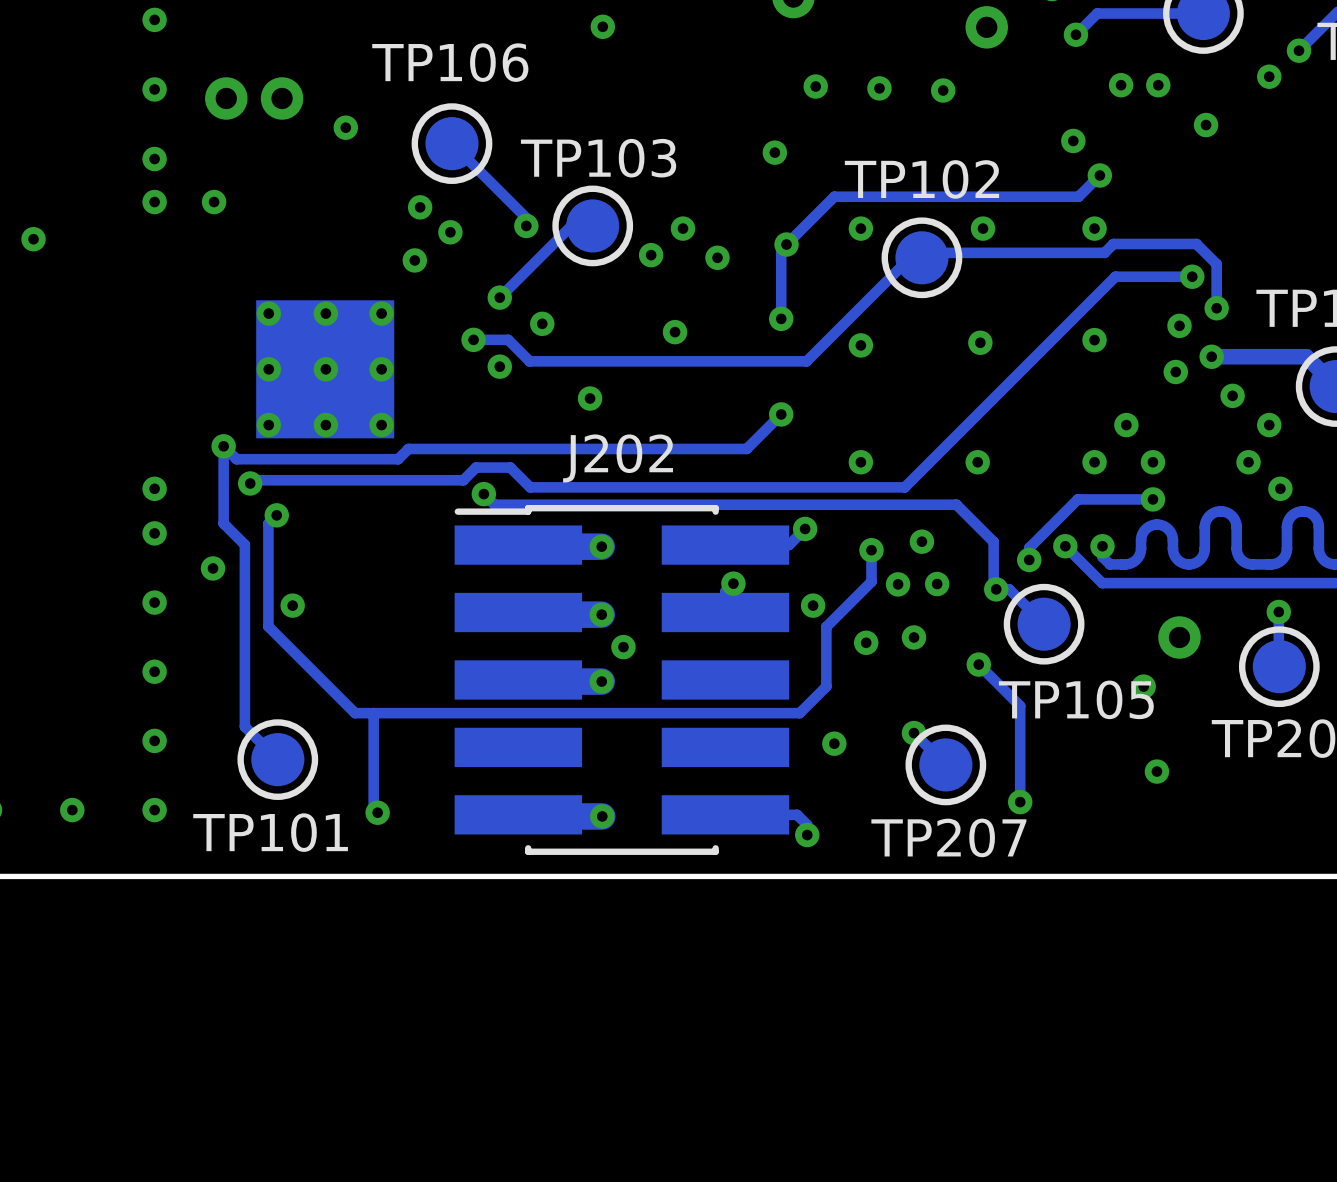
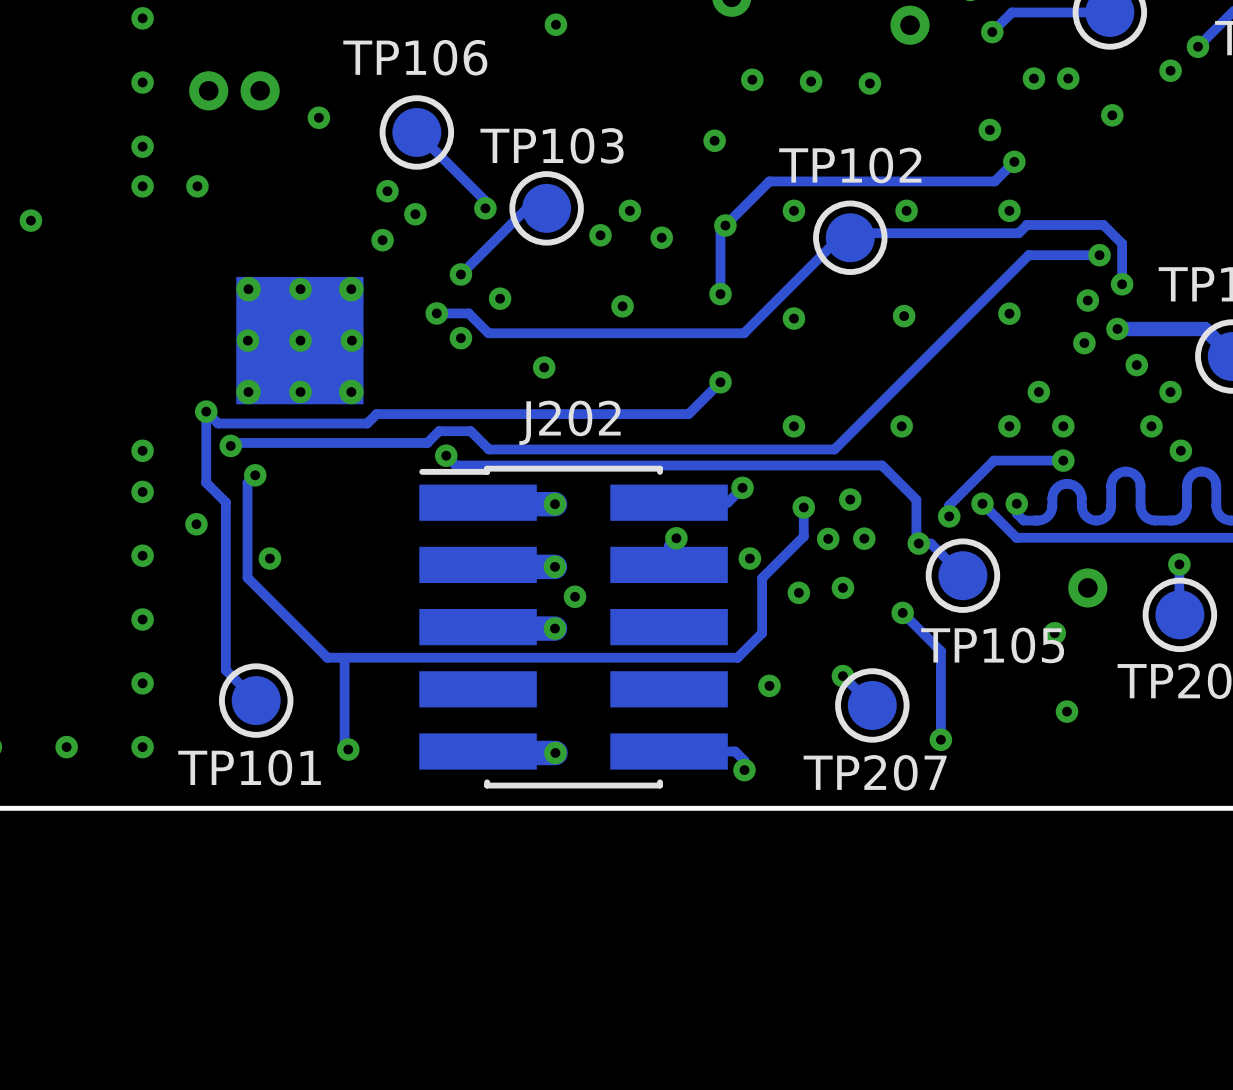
part footprint: [256, 300, 395, 439] -> [236, 276, 364, 405]
via: (268, 313) -> none
via: (381, 313) -> none
via: (268, 425) -> none
via: (381, 425) -> none

